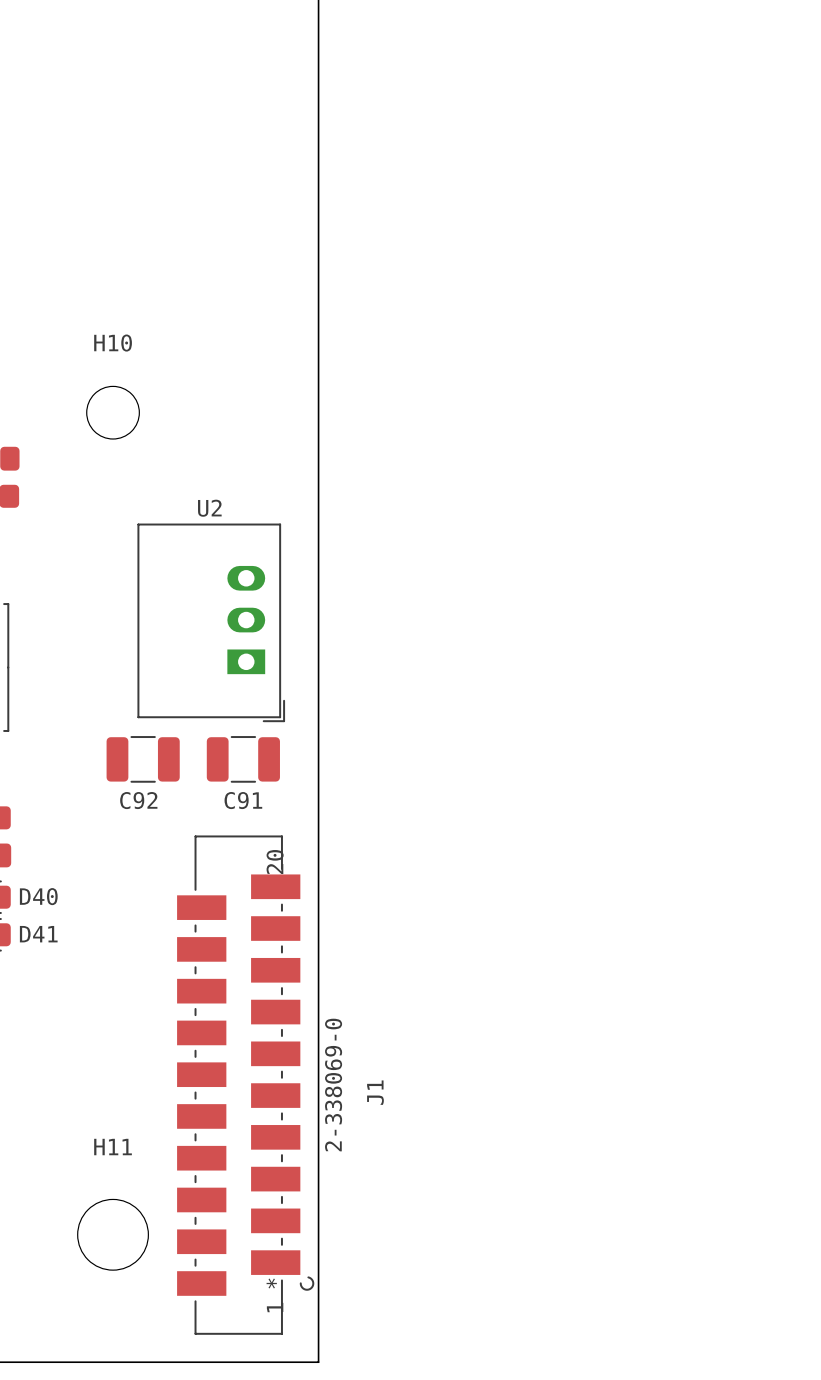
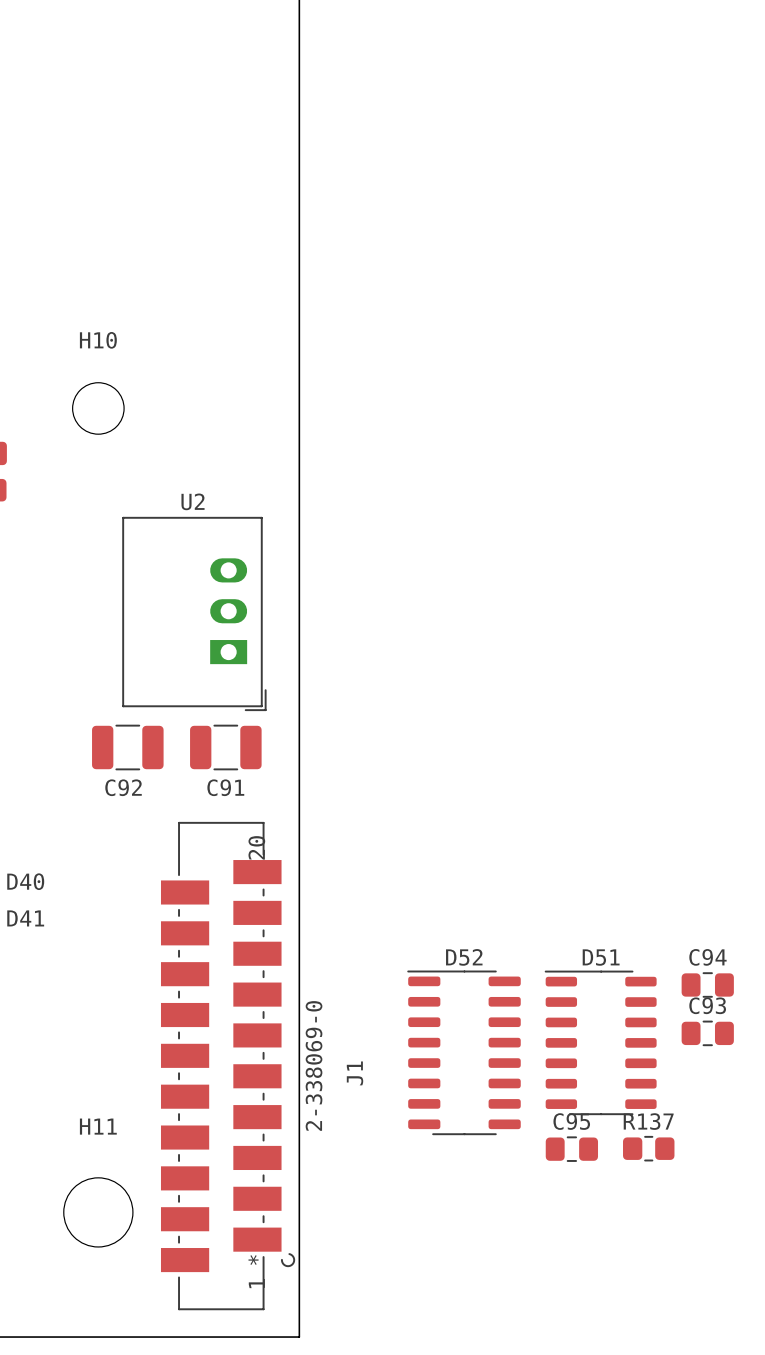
C94: none -> (707, 984)
C93: none -> (707, 1033)
D51: none -> (600, 1042)
D52: none -> (463, 1052)
R137: none -> (648, 1148)
C95: none -> (571, 1149)

